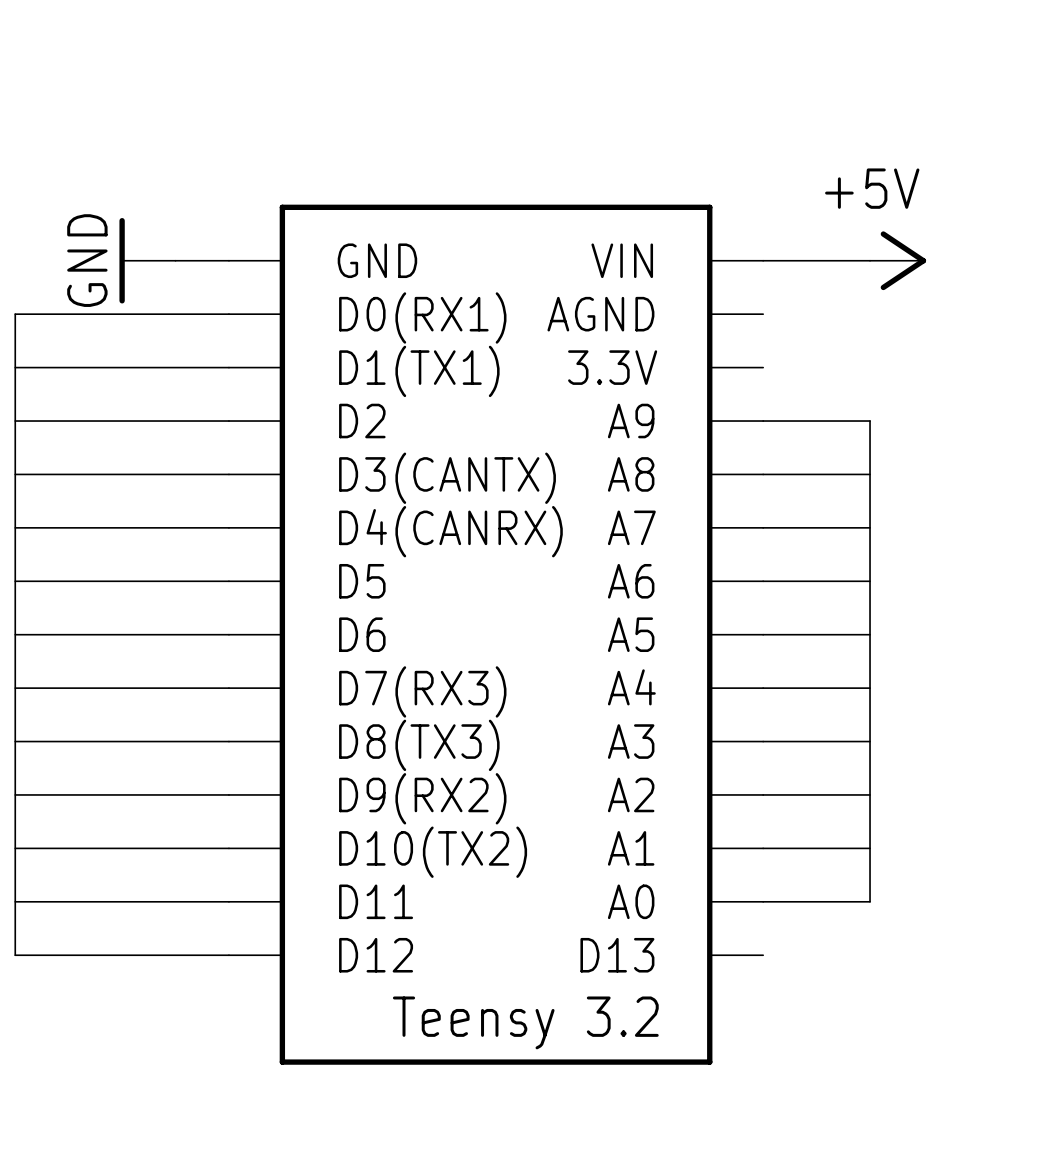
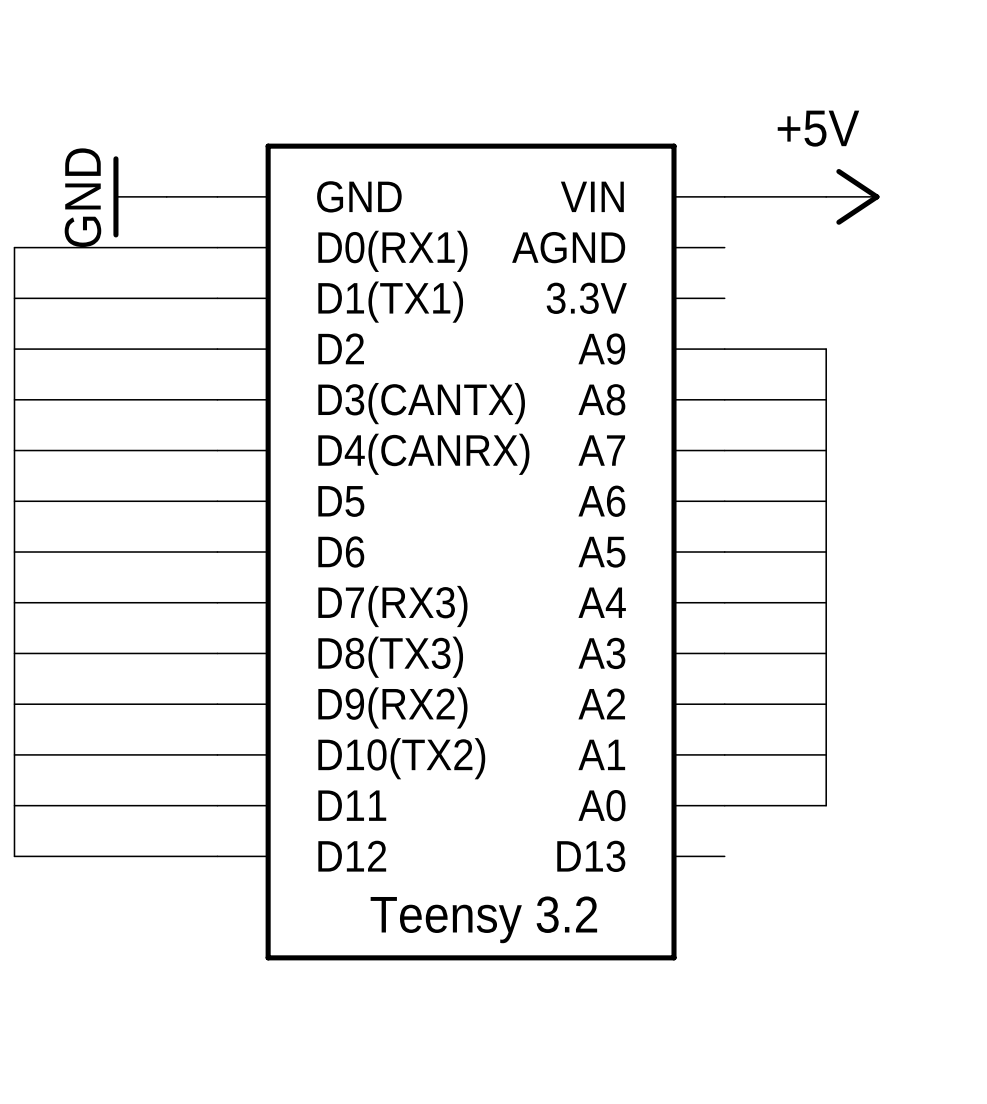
wire: none -> (166, 196) (217, 196)
bus: none -> (14, 247) (14, 298)
wire: none -> (14, 247) (166, 247)
power symbol position: GND (147, 260) -> GND (140, 196)
wire: (763, 260) (870, 260) -> (724, 196) (826, 196)
power symbol position: +5V (898, 260) -> +5V (852, 196)
wire: none -> (724, 349) (826, 349)
part position: (496, 634) -> (471, 552)
bus: (870, 848) (870, 901) -> (826, 349) (826, 399)
bus: (15, 901) (15, 955) -> none
wire: (763, 901) (870, 901) -> none
wire: (15, 955) (228, 955) -> none

